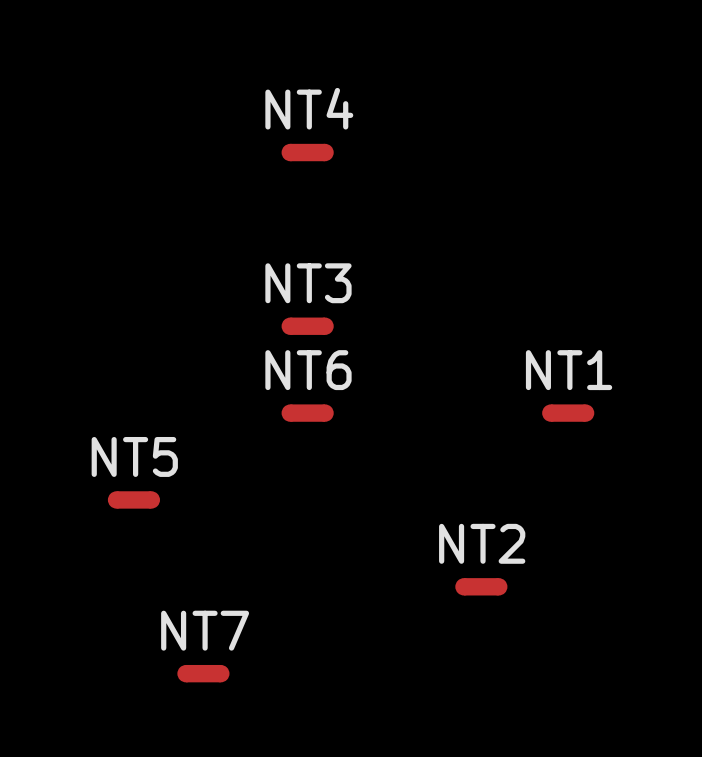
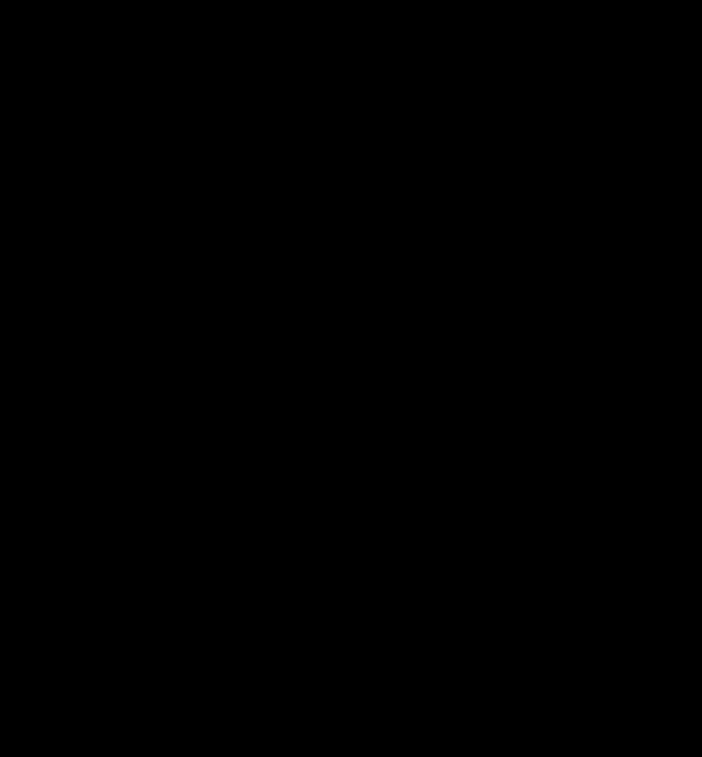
NT4: (307, 152) -> none
NT3: (307, 326) -> none
NT6: (307, 413) -> none
NT1: (568, 413) -> none
NT5: (133, 499) -> none
NT2: (481, 586) -> none
NT7: (203, 673) -> none

